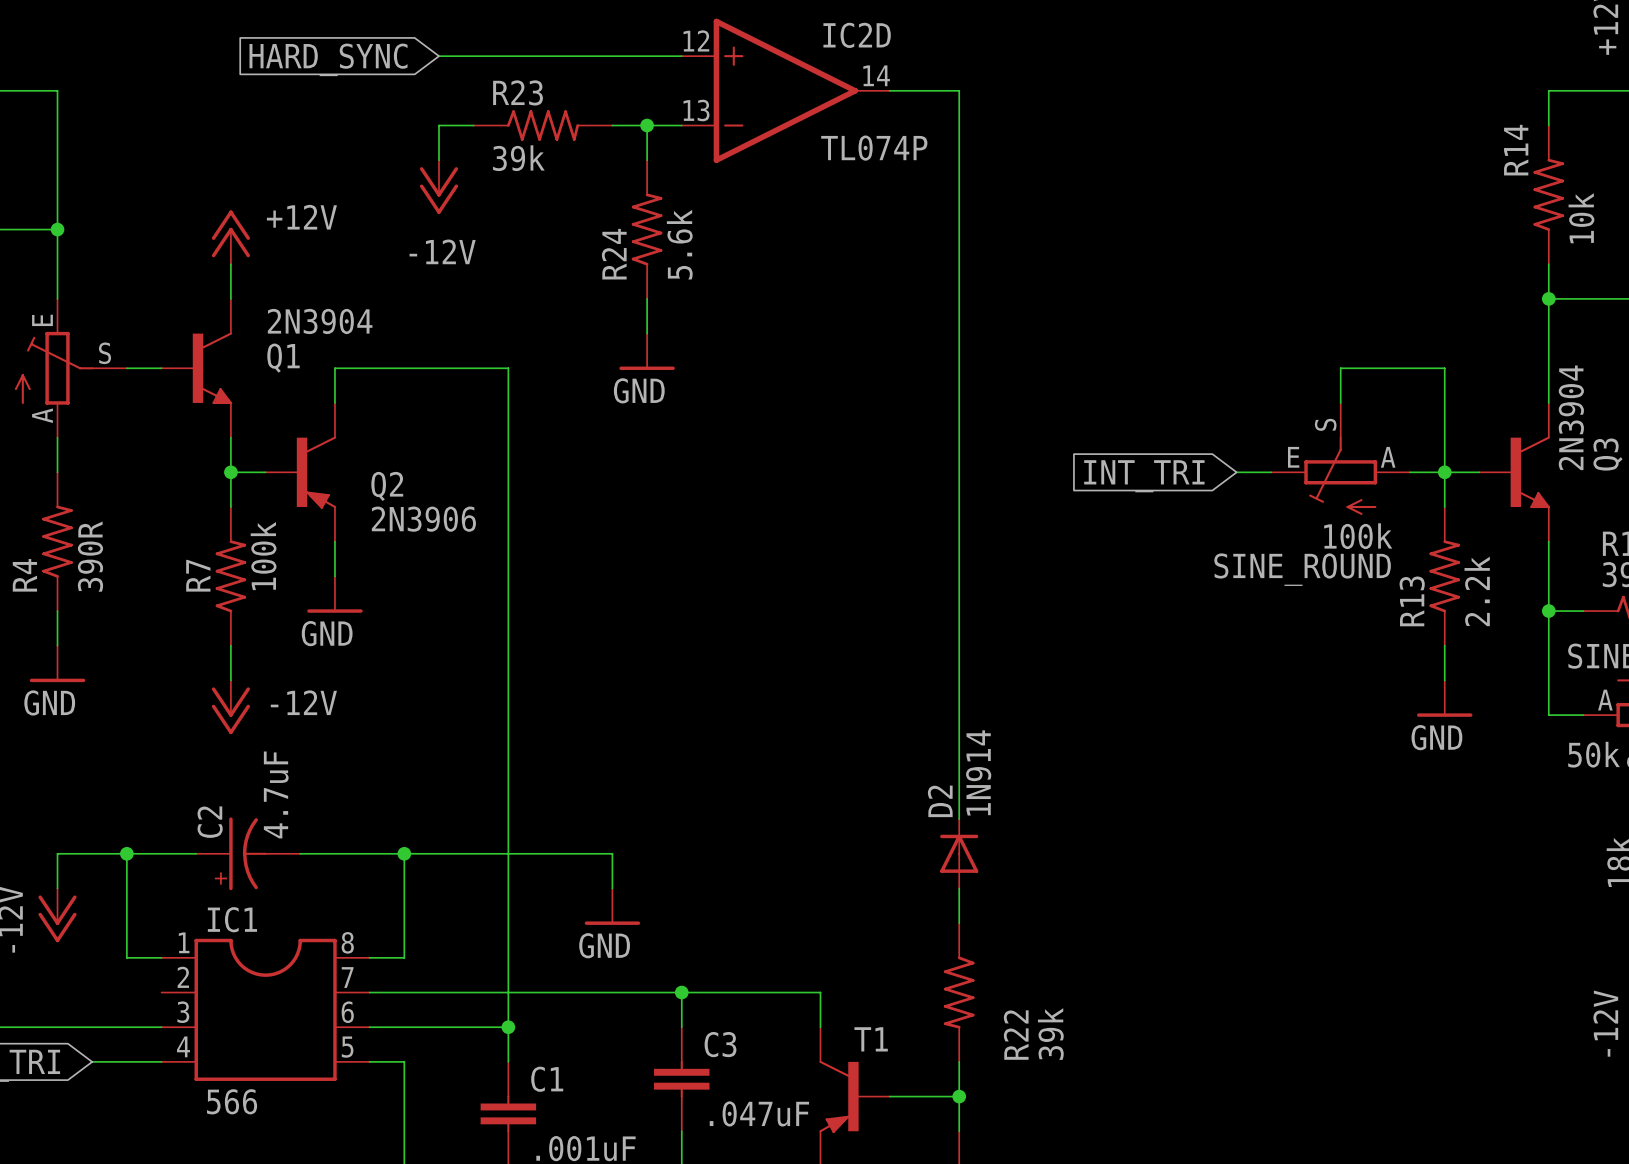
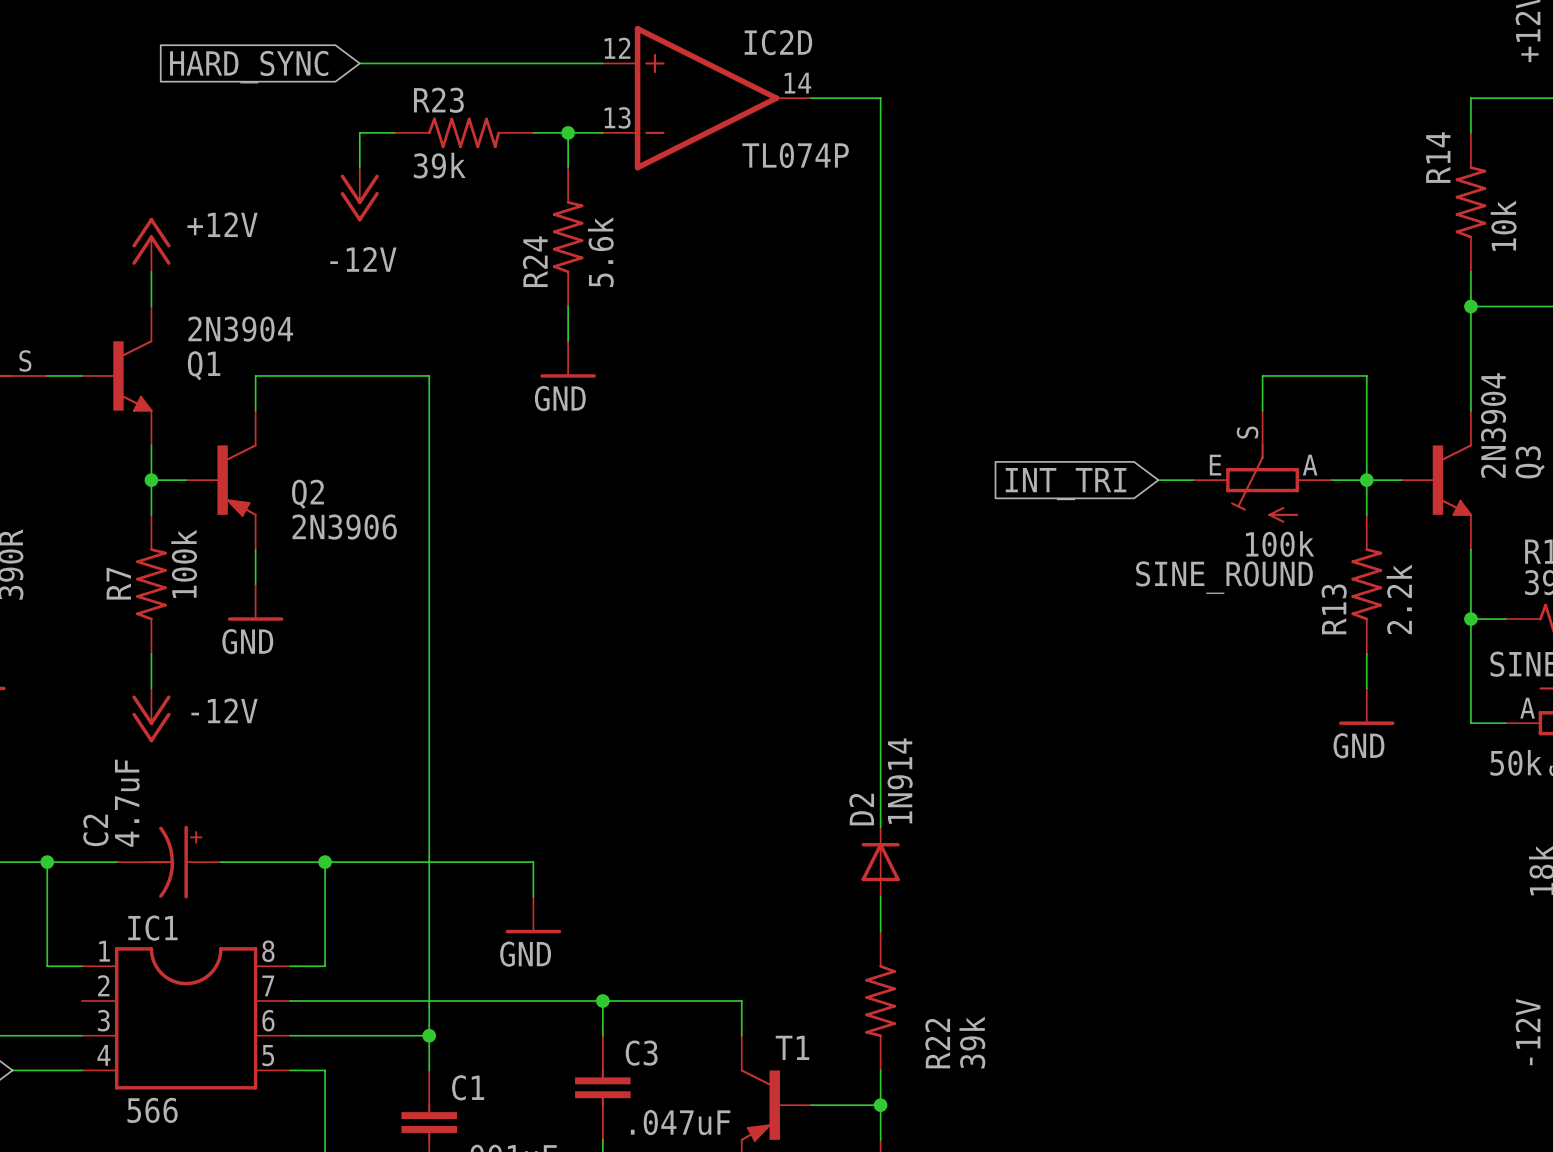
C2 value position: 4.7uF (276, 794) -> 4.7uF (127, 803)
C2 name position: C2 (210, 822) -> C2 (95, 830)
C2 rotation: 0° (240, 853) -> 180° (176, 862)

